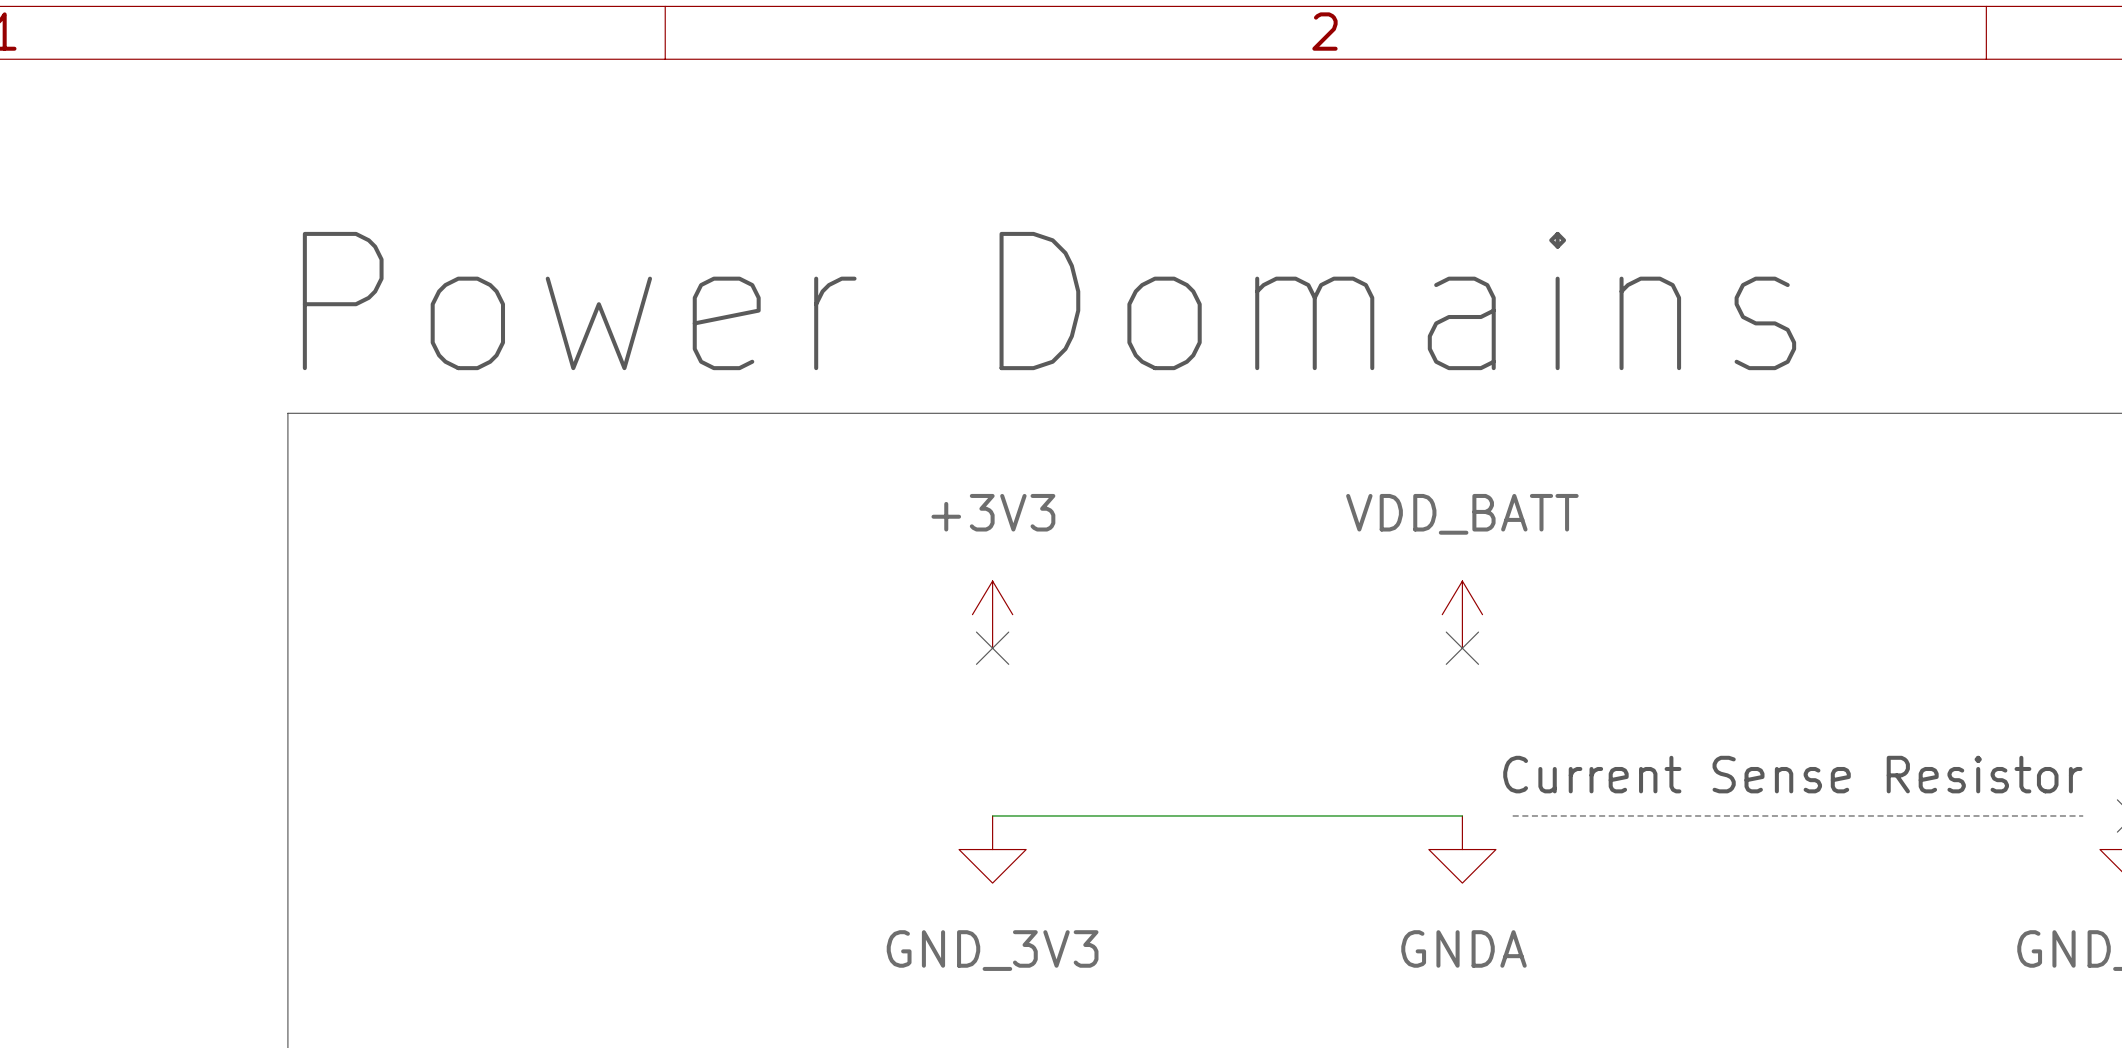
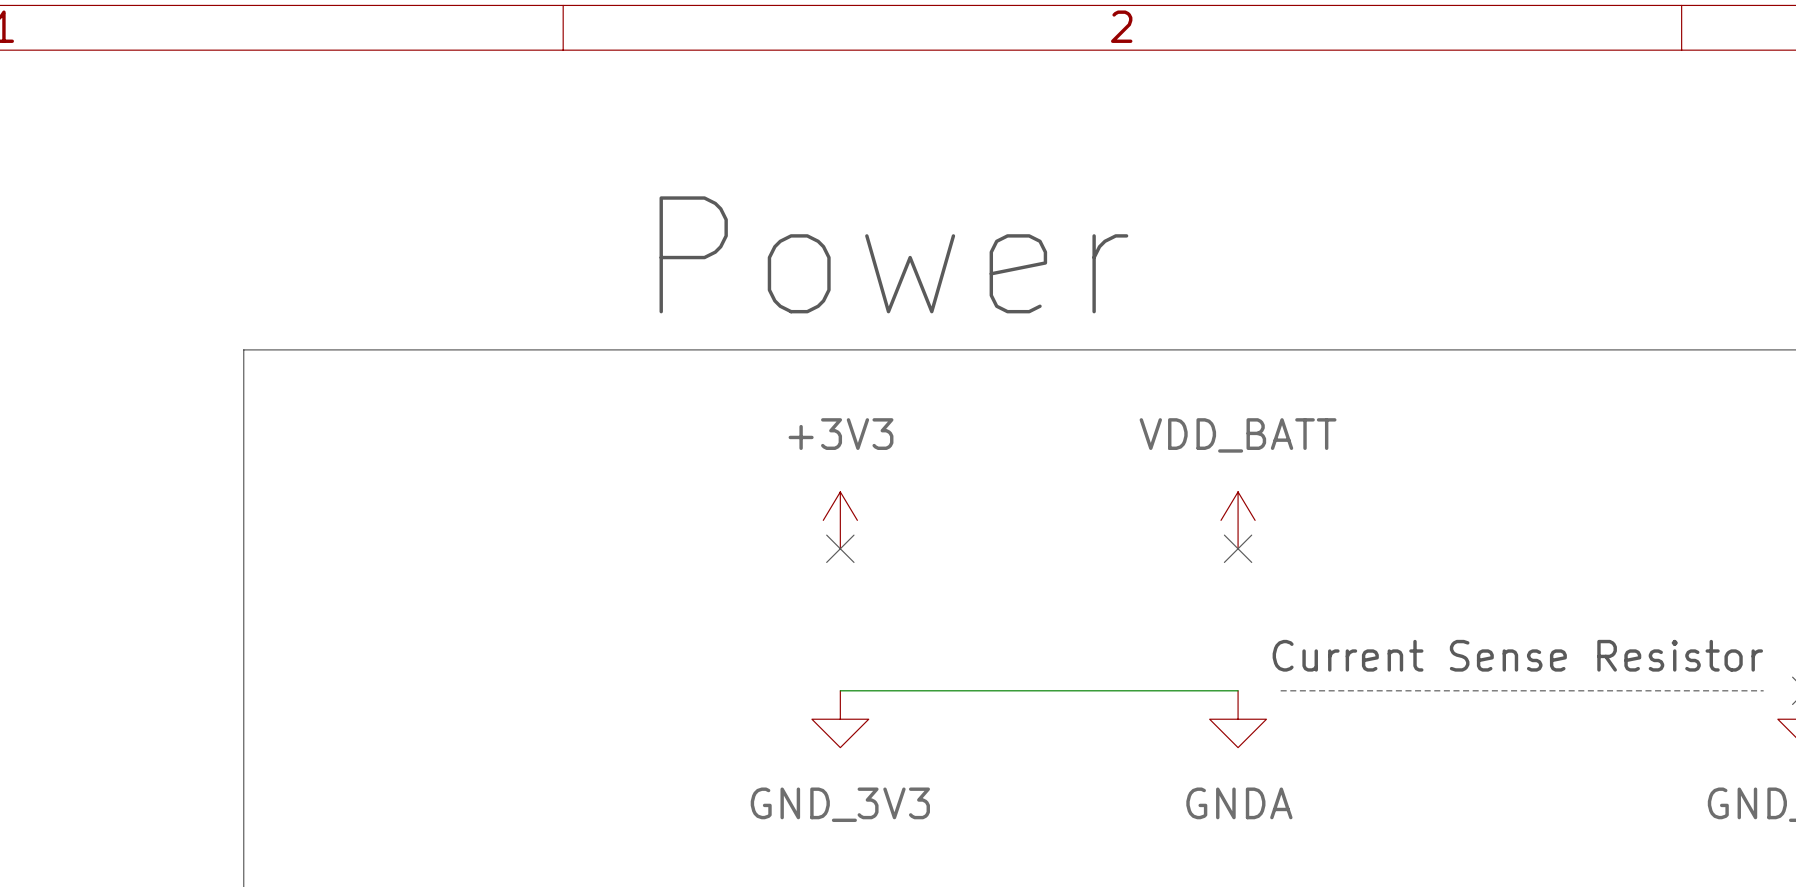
text: Power Domains (1049, 301) -> Power (893, 254)

